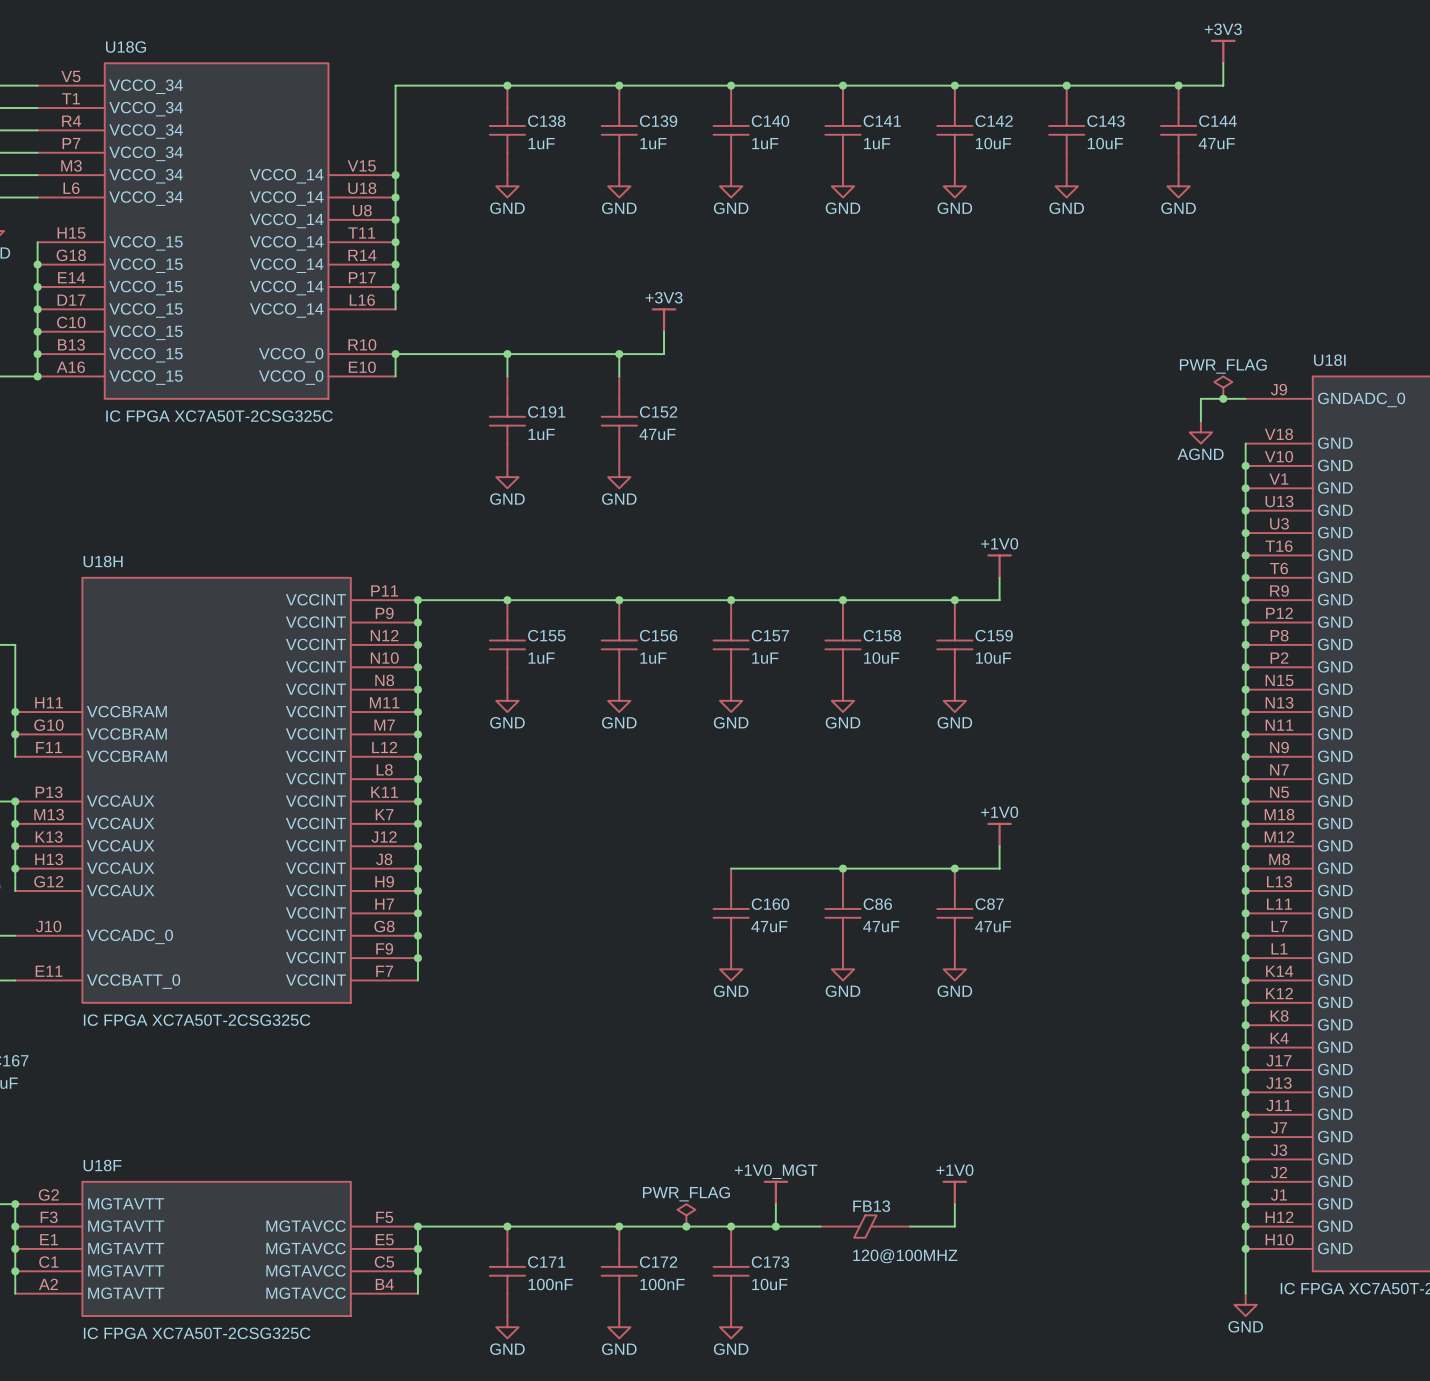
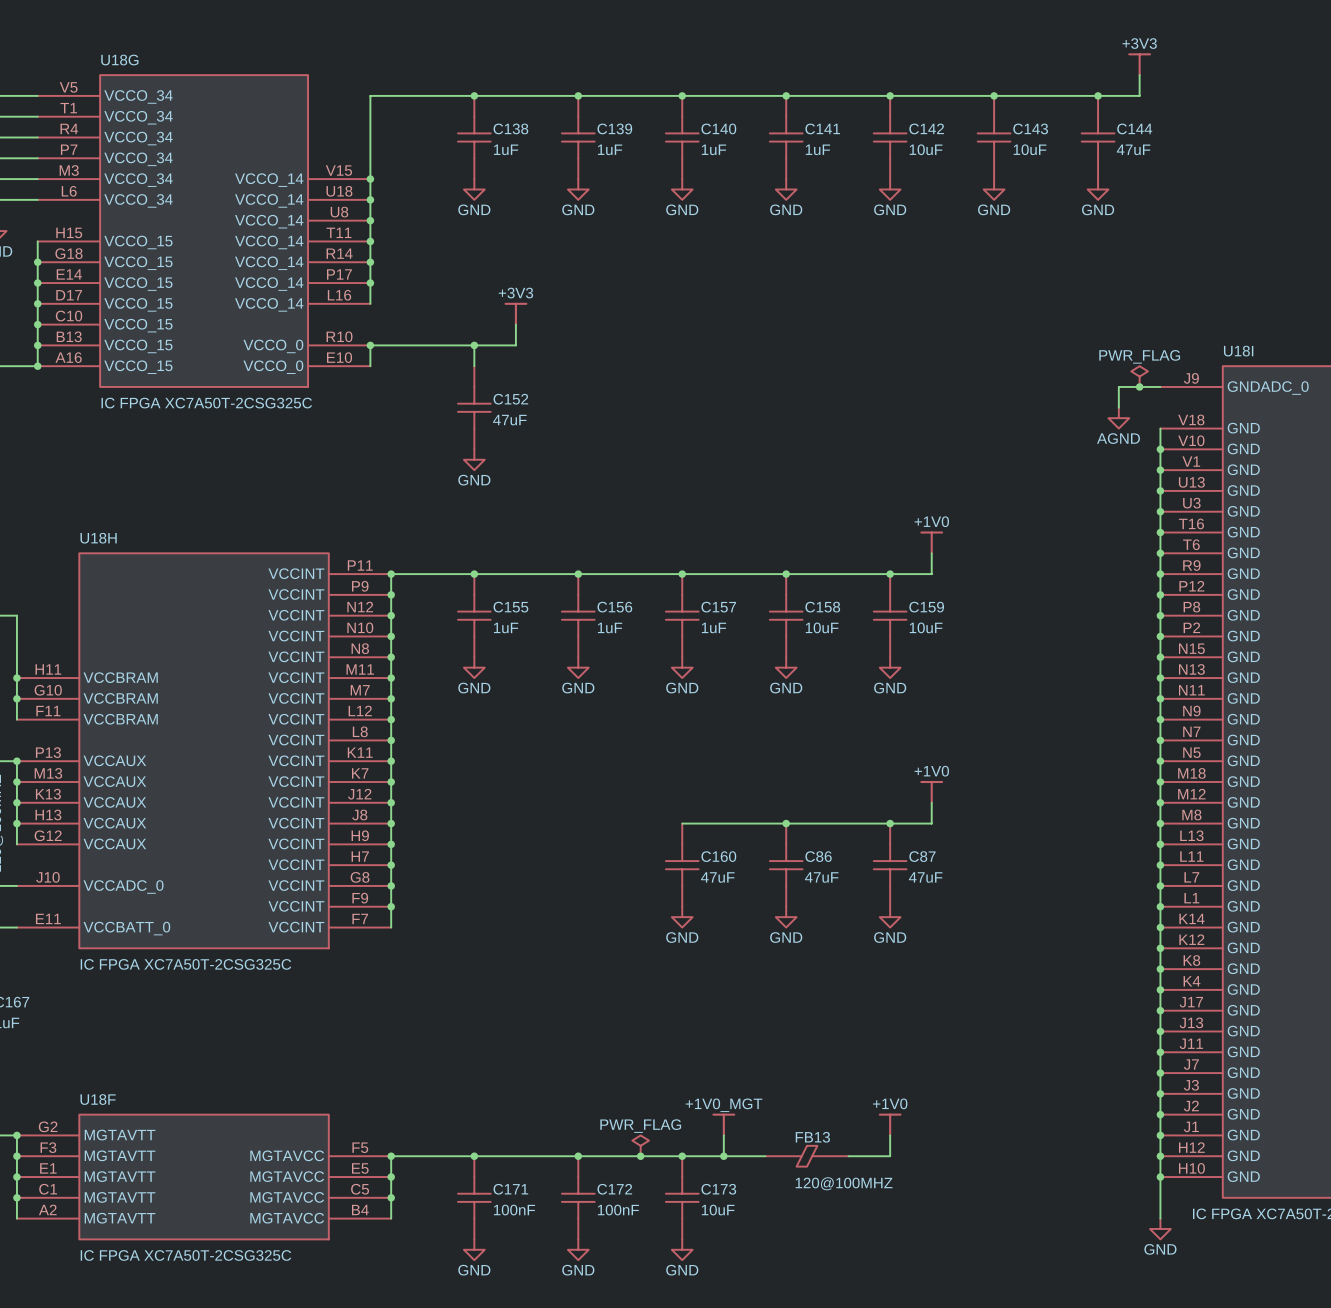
power symbol position: +3V3 (664, 320) -> +3V3 (515, 314)
wire: (664, 331) (664, 354) (552, 354) -> (515, 324) (515, 345)
wire: (619, 354) (619, 376) -> none
junction: (619, 354) -> none
C191 name: C191 (546, 412) -> C152 (510, 399)
C152: 47uF (619, 421) -> none
C191 value: 1uF (541, 434) -> 47uF (509, 420)
power symbol: GND (619, 477) -> none

